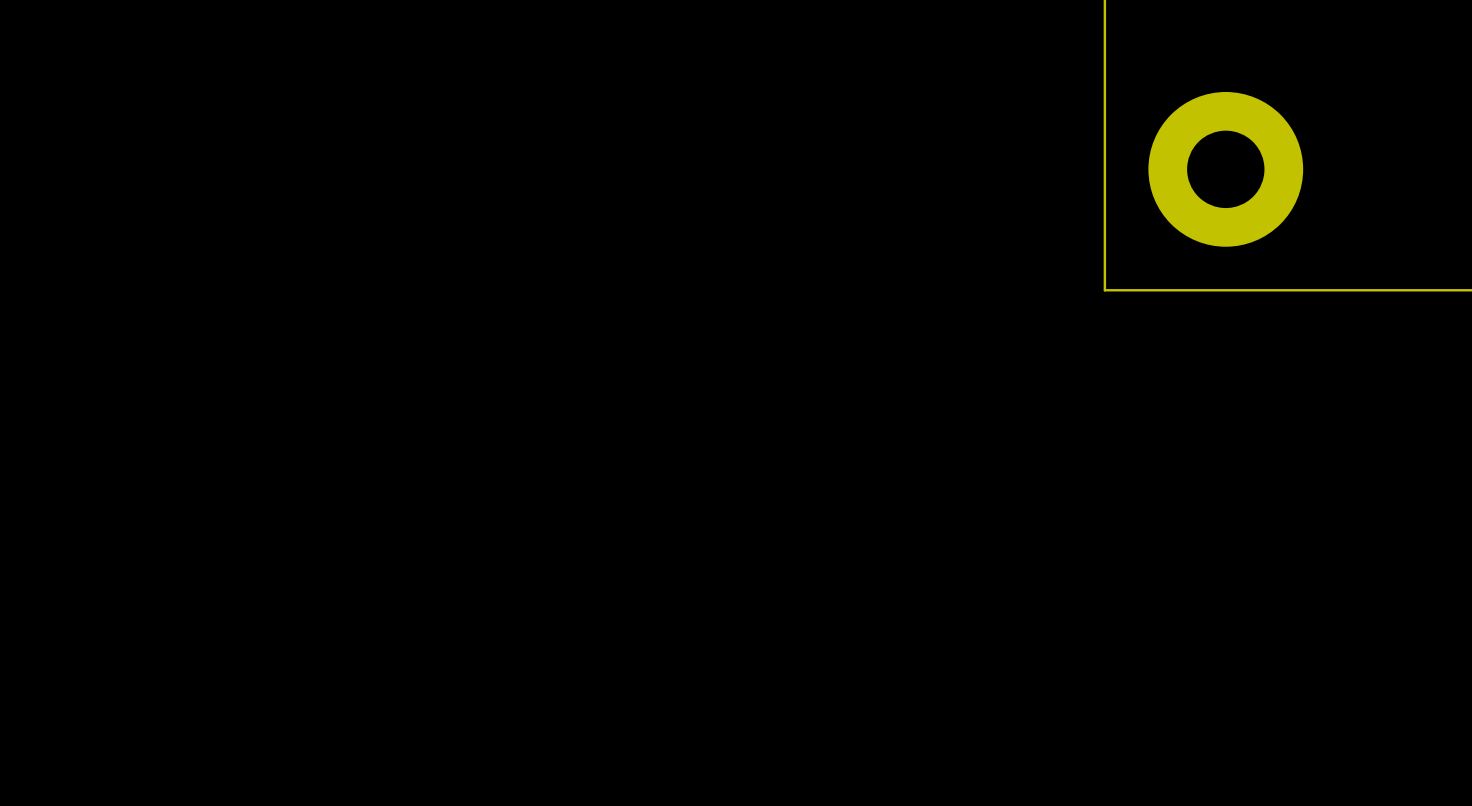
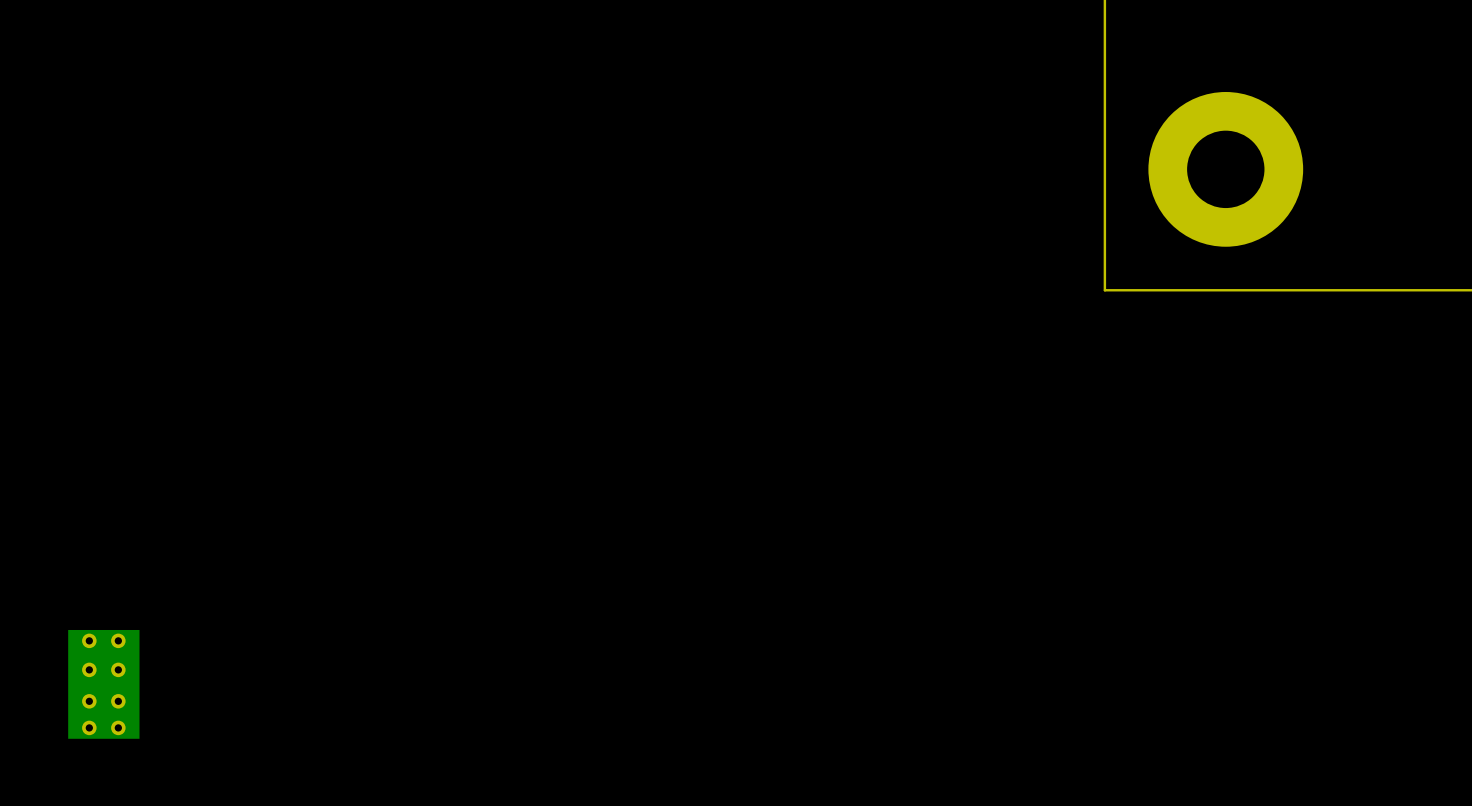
part: none -> (103, 684)

